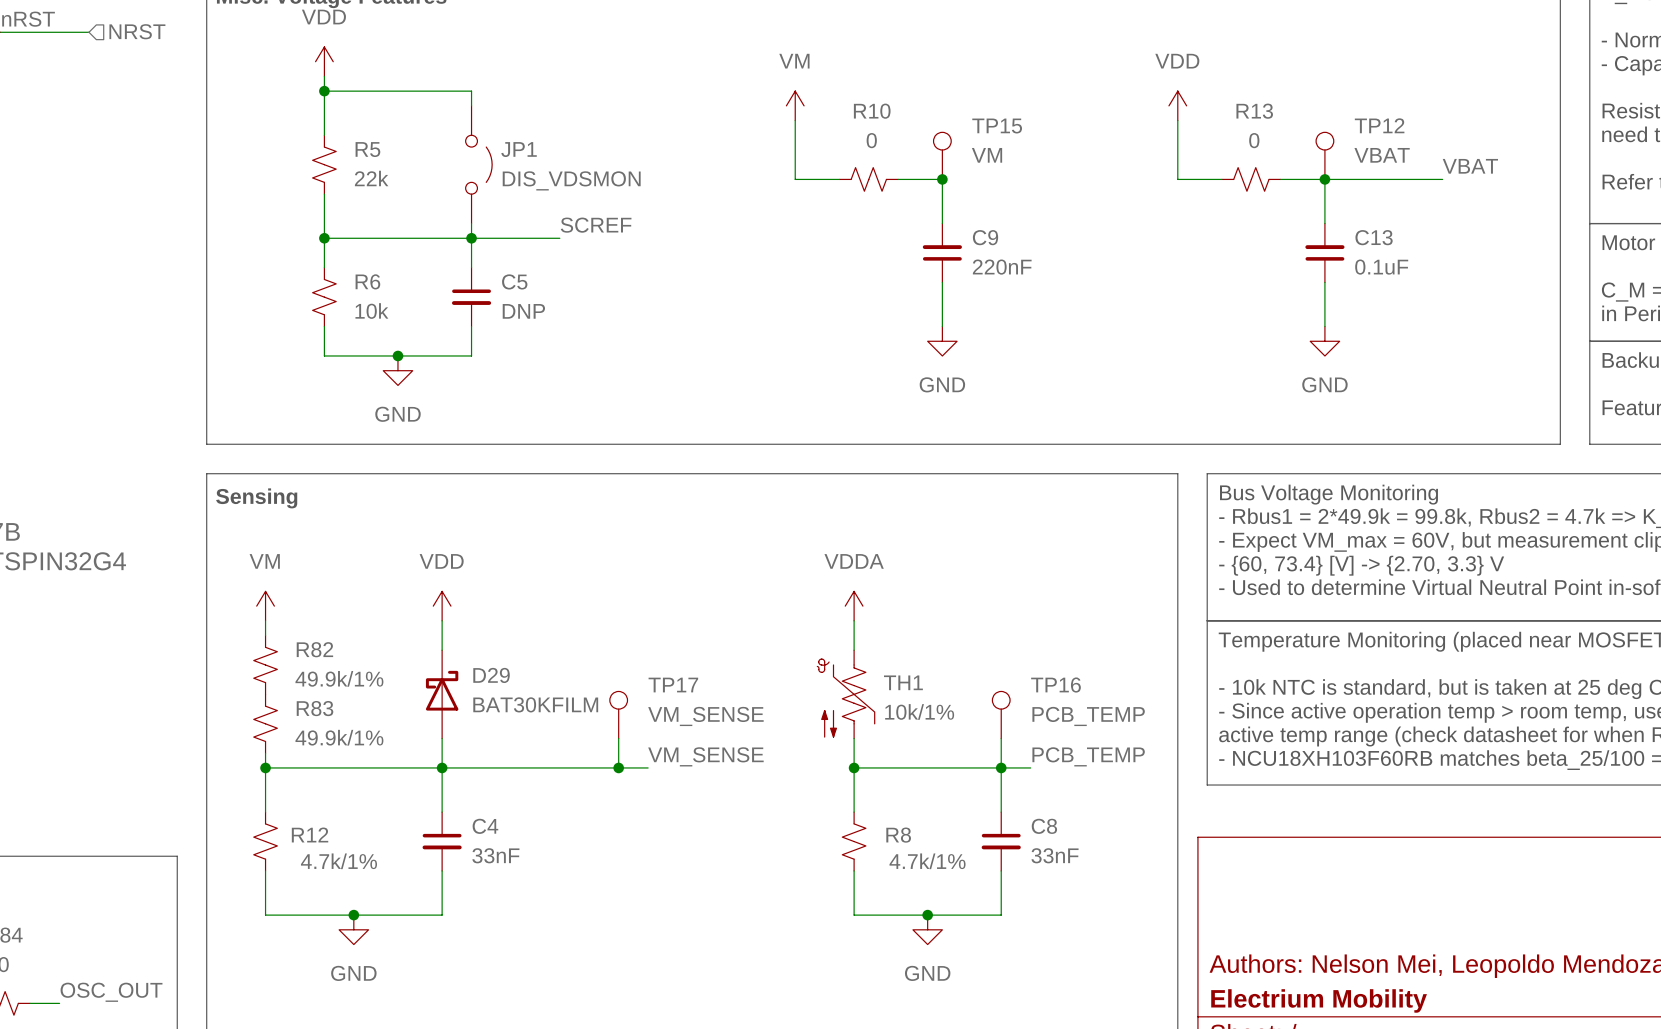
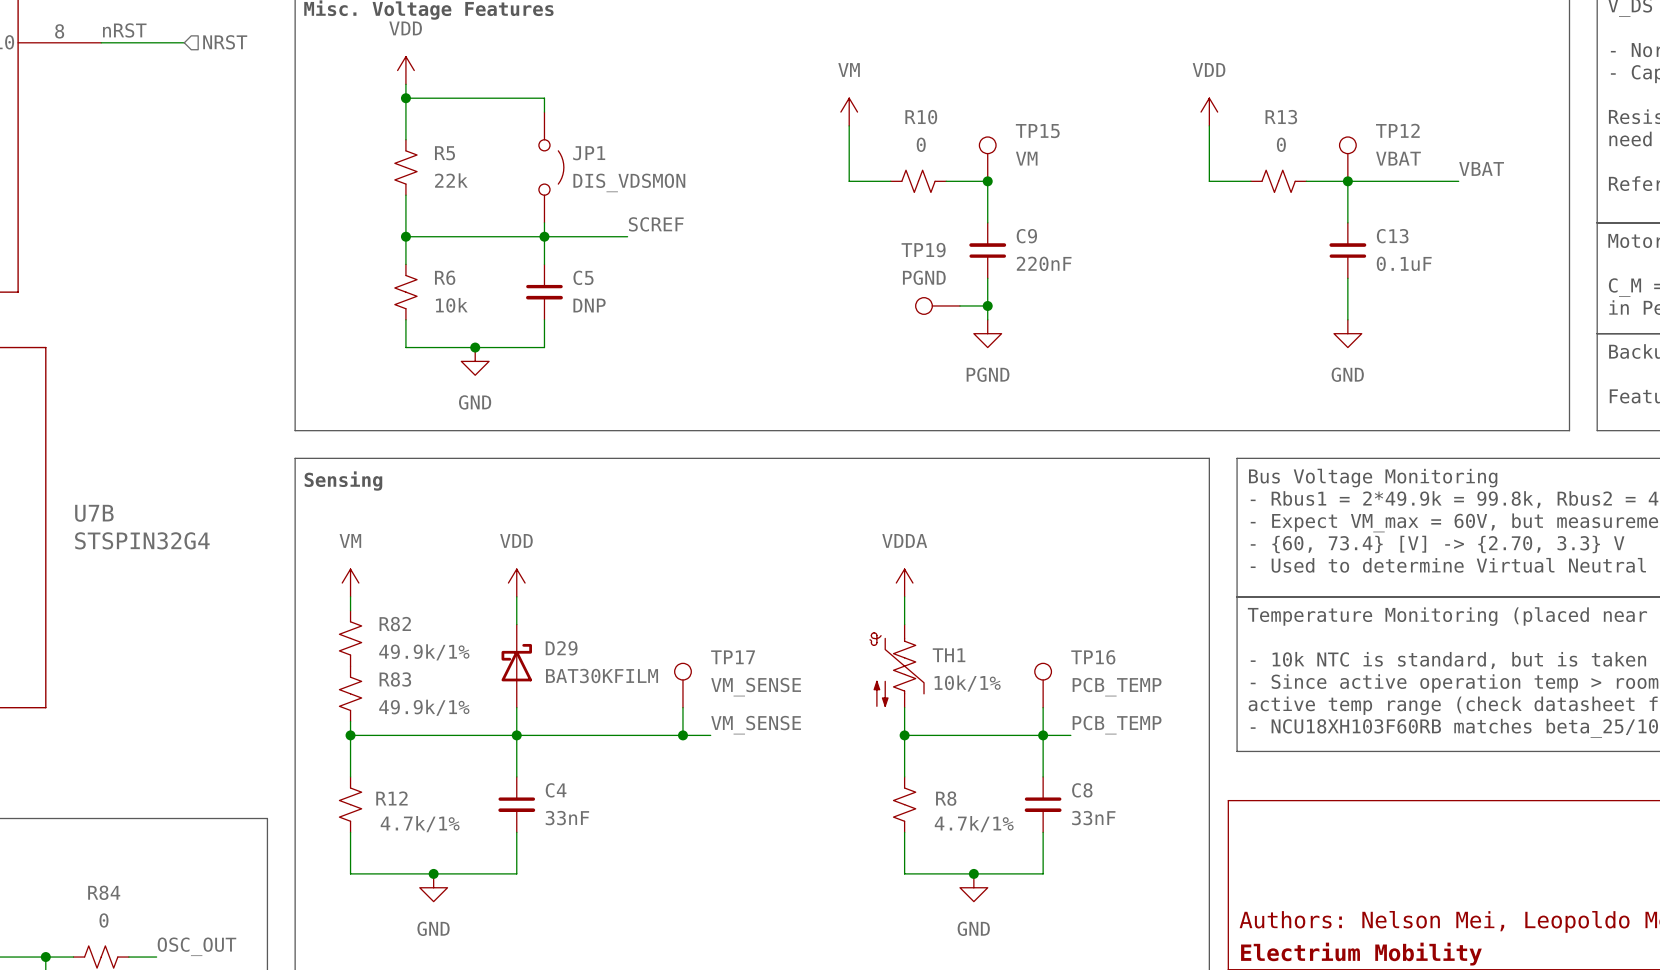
TP19: none -> PGND (937, 305)
wire: none -> (960, 305) (987, 305)
junction: none -> (987, 305)
power symbol: GND (942, 341) -> PGND (987, 333)

